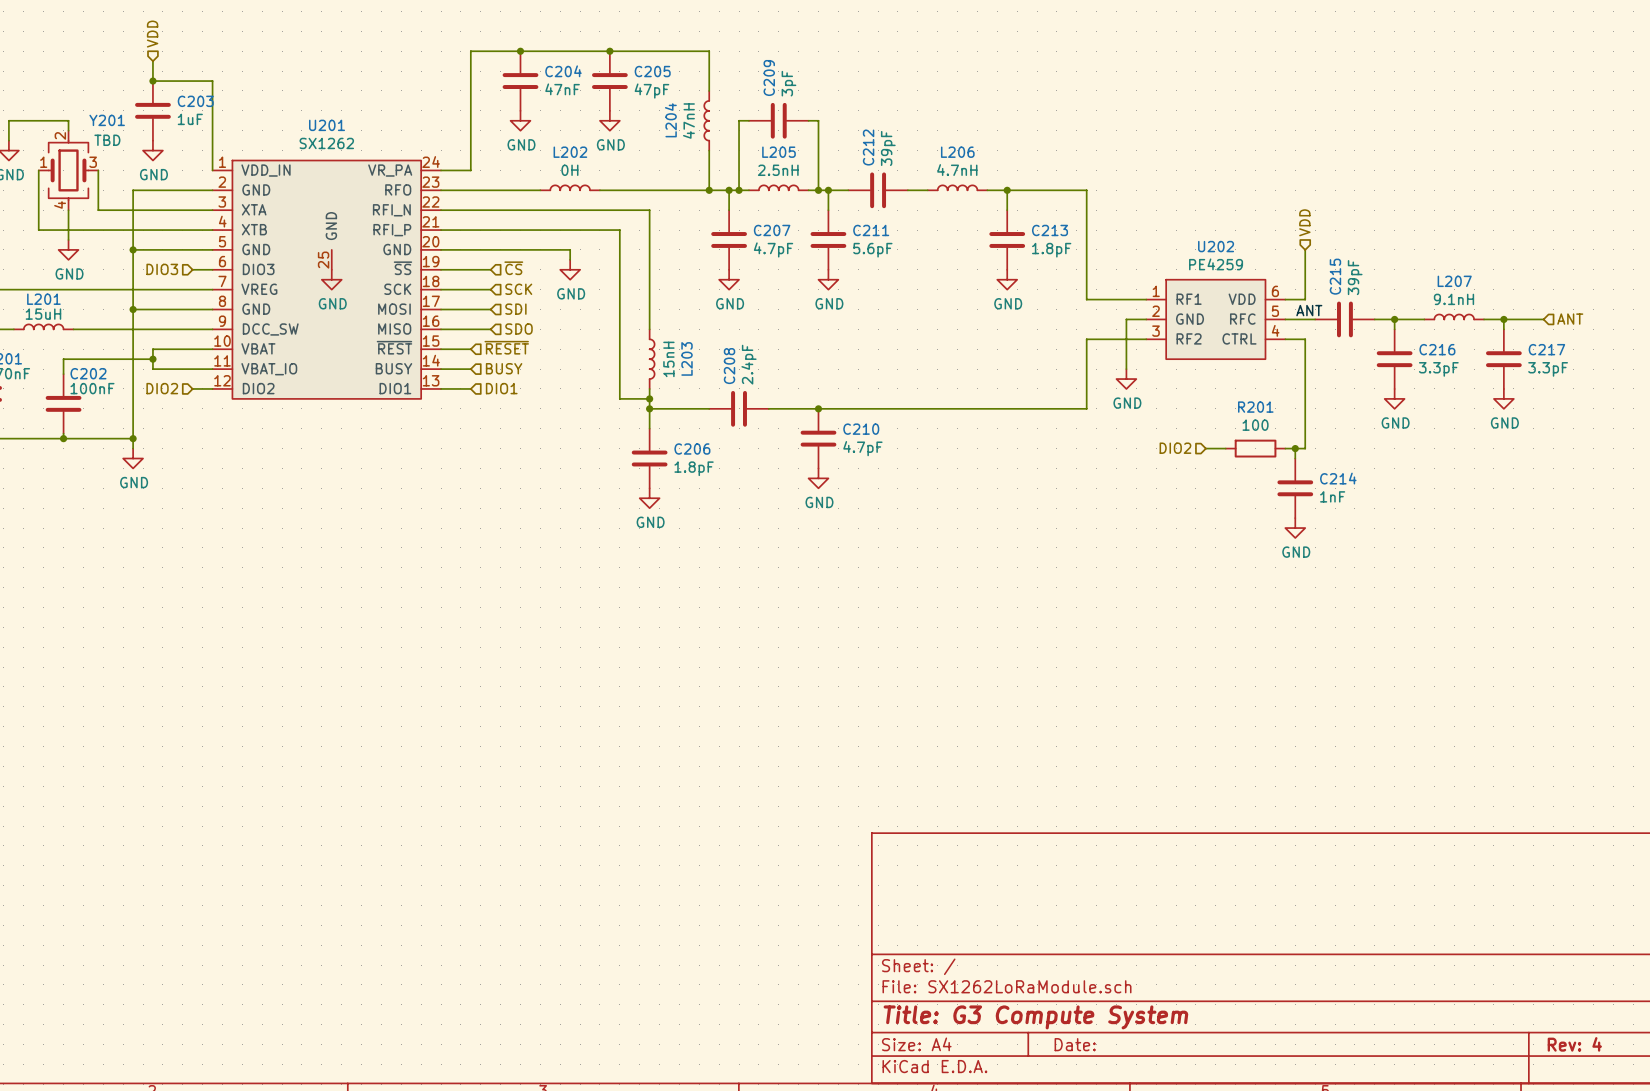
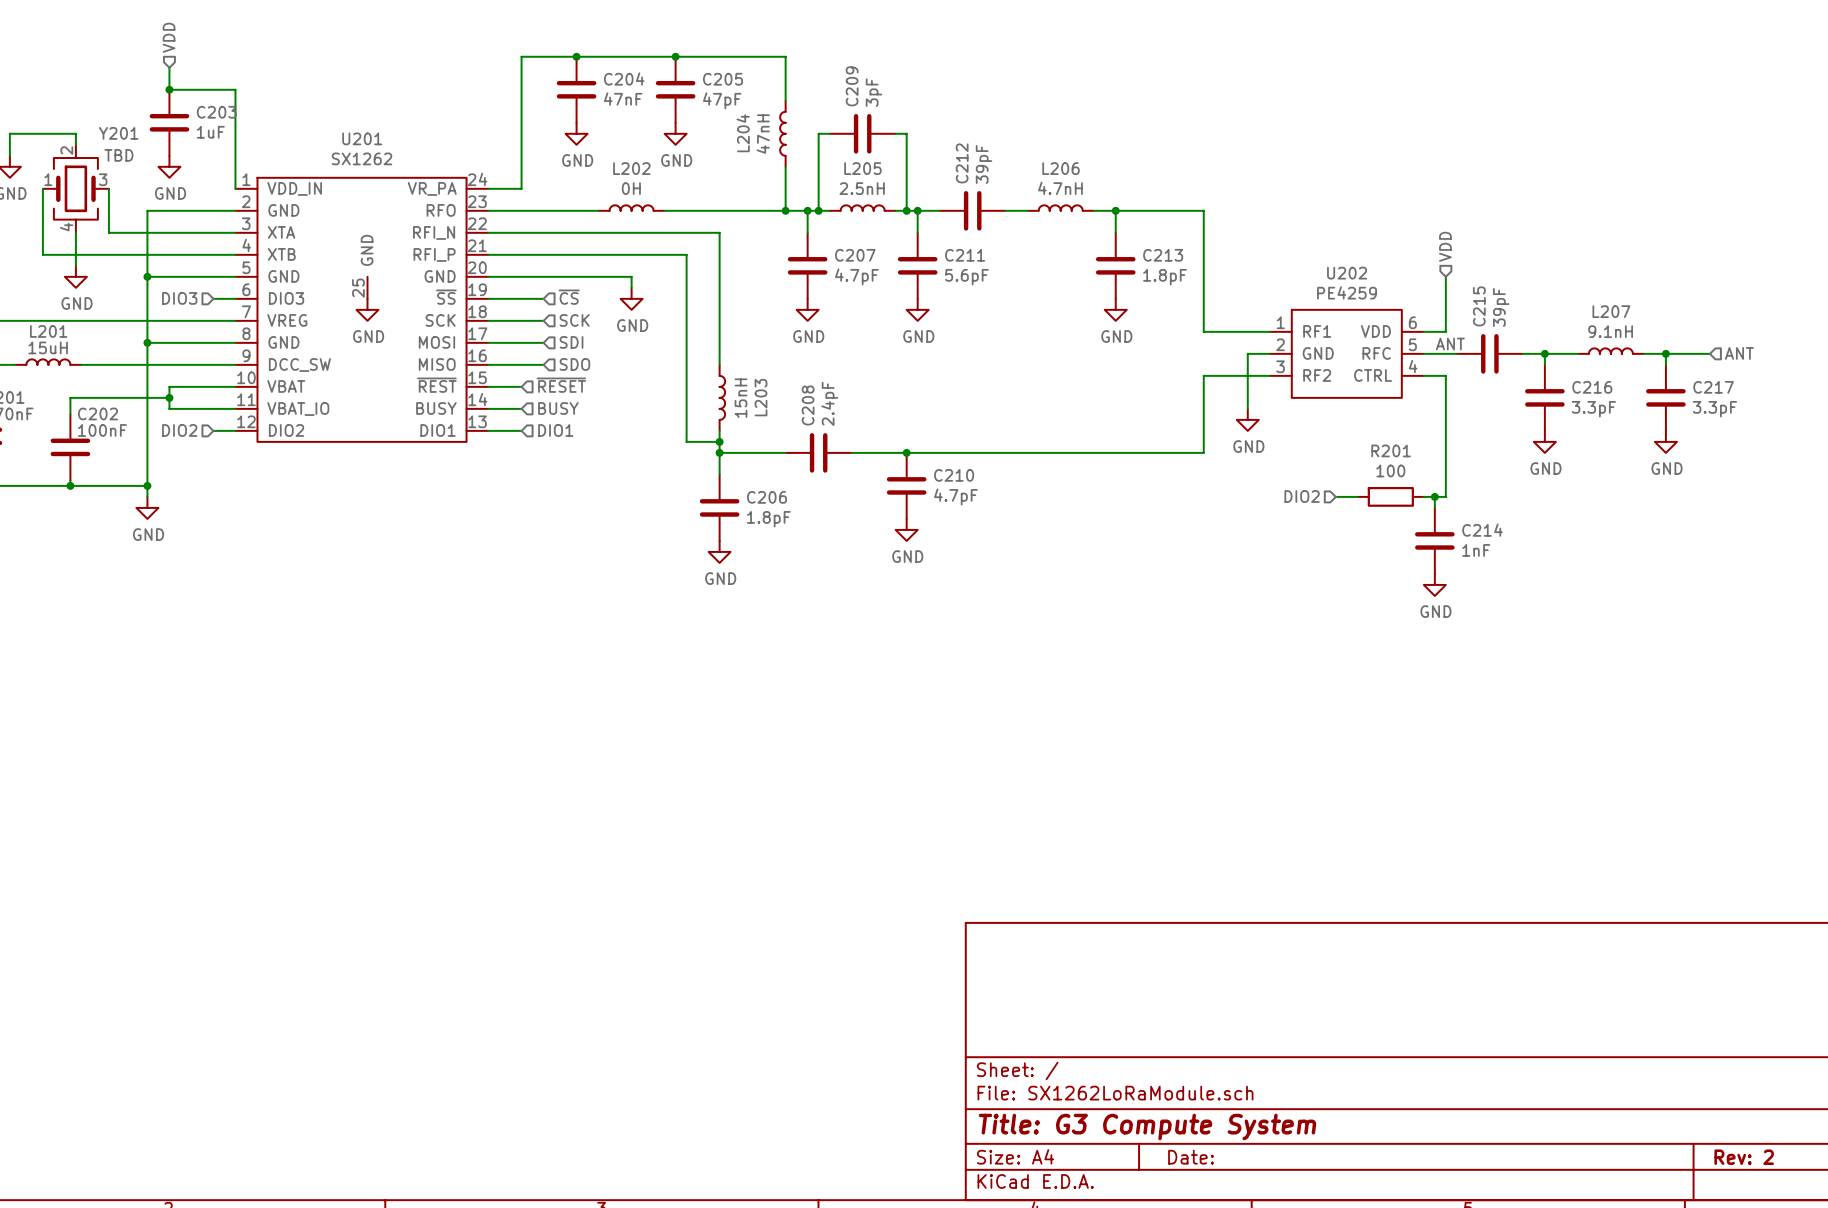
title block: Rev: 4 (1574, 1044) -> Rev: 2 (1744, 1157)

